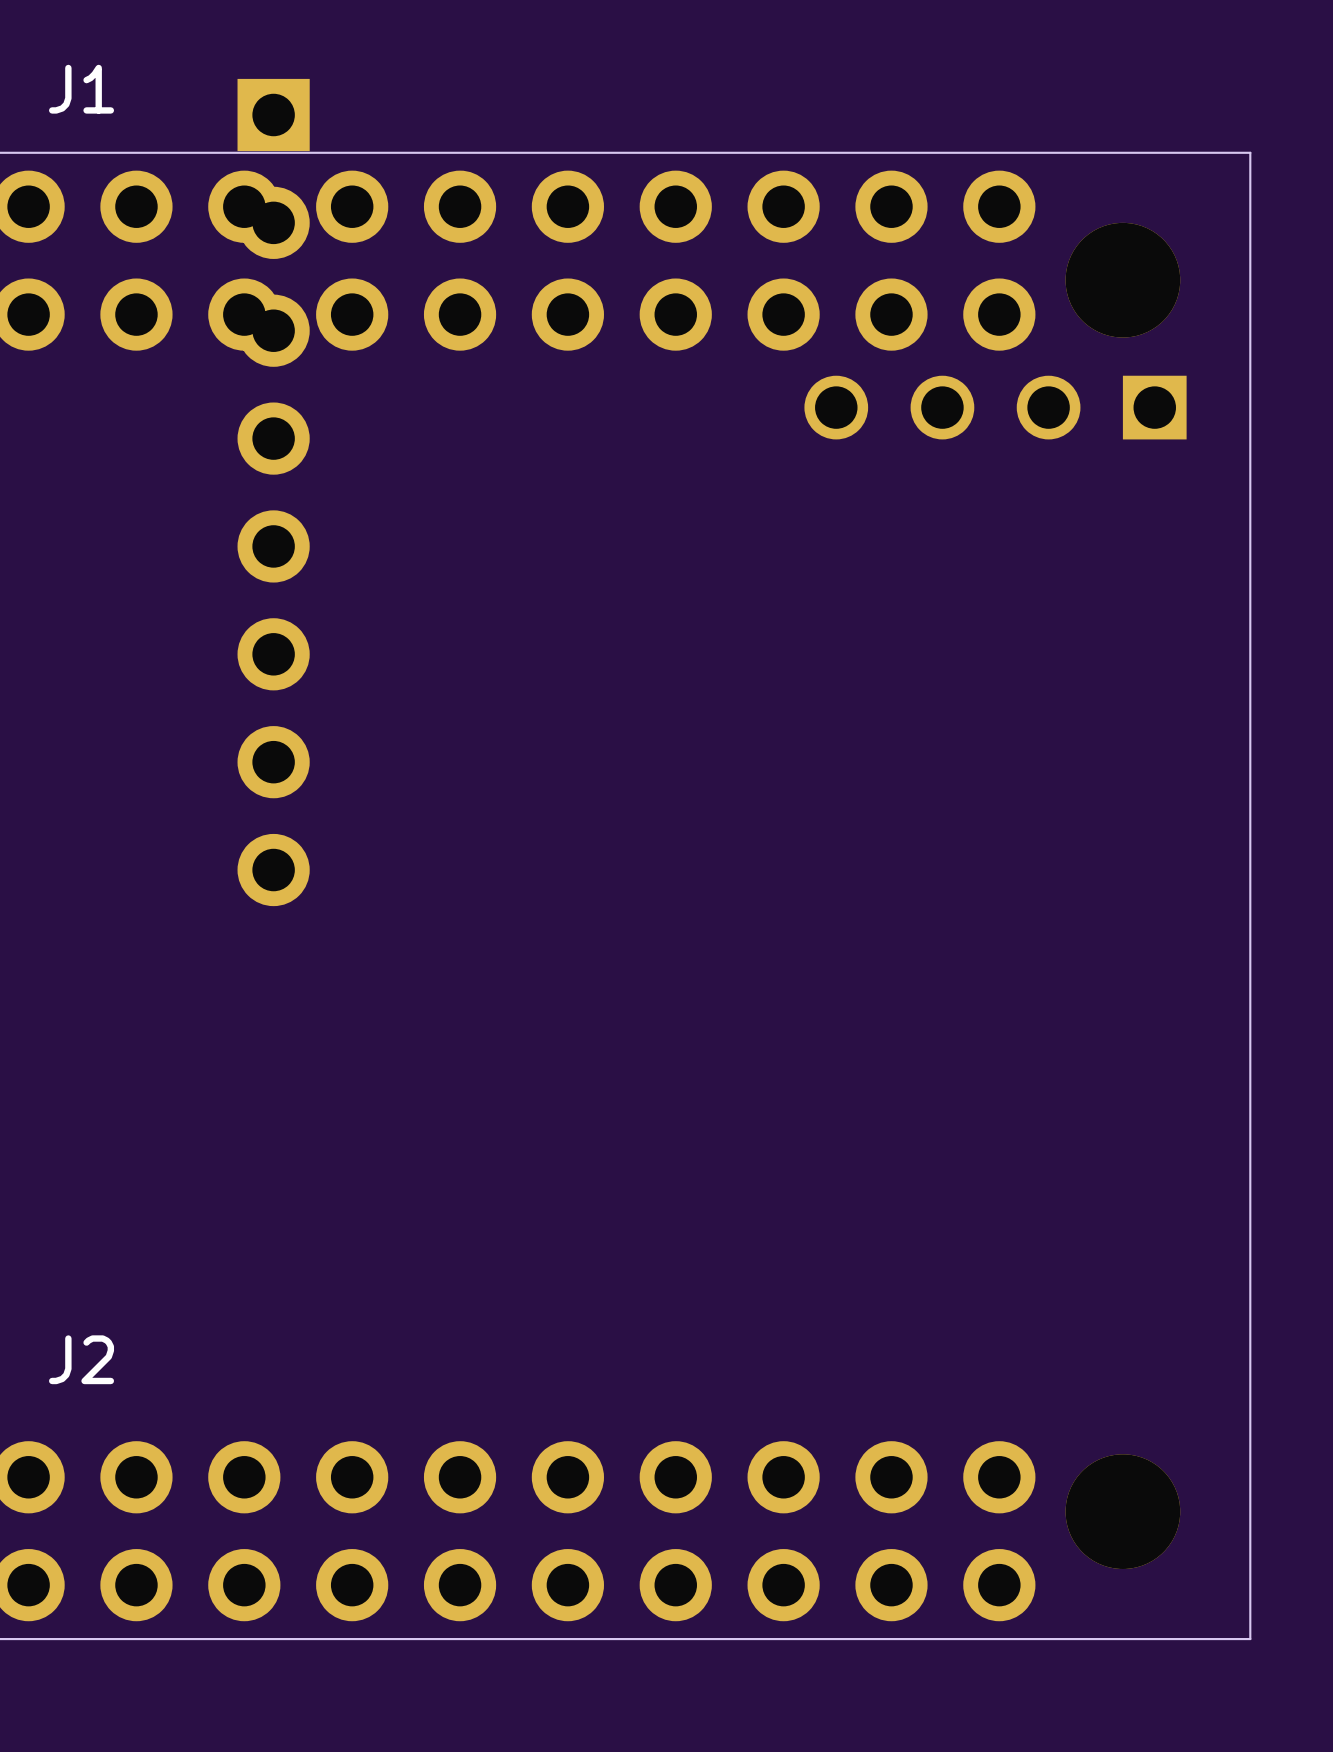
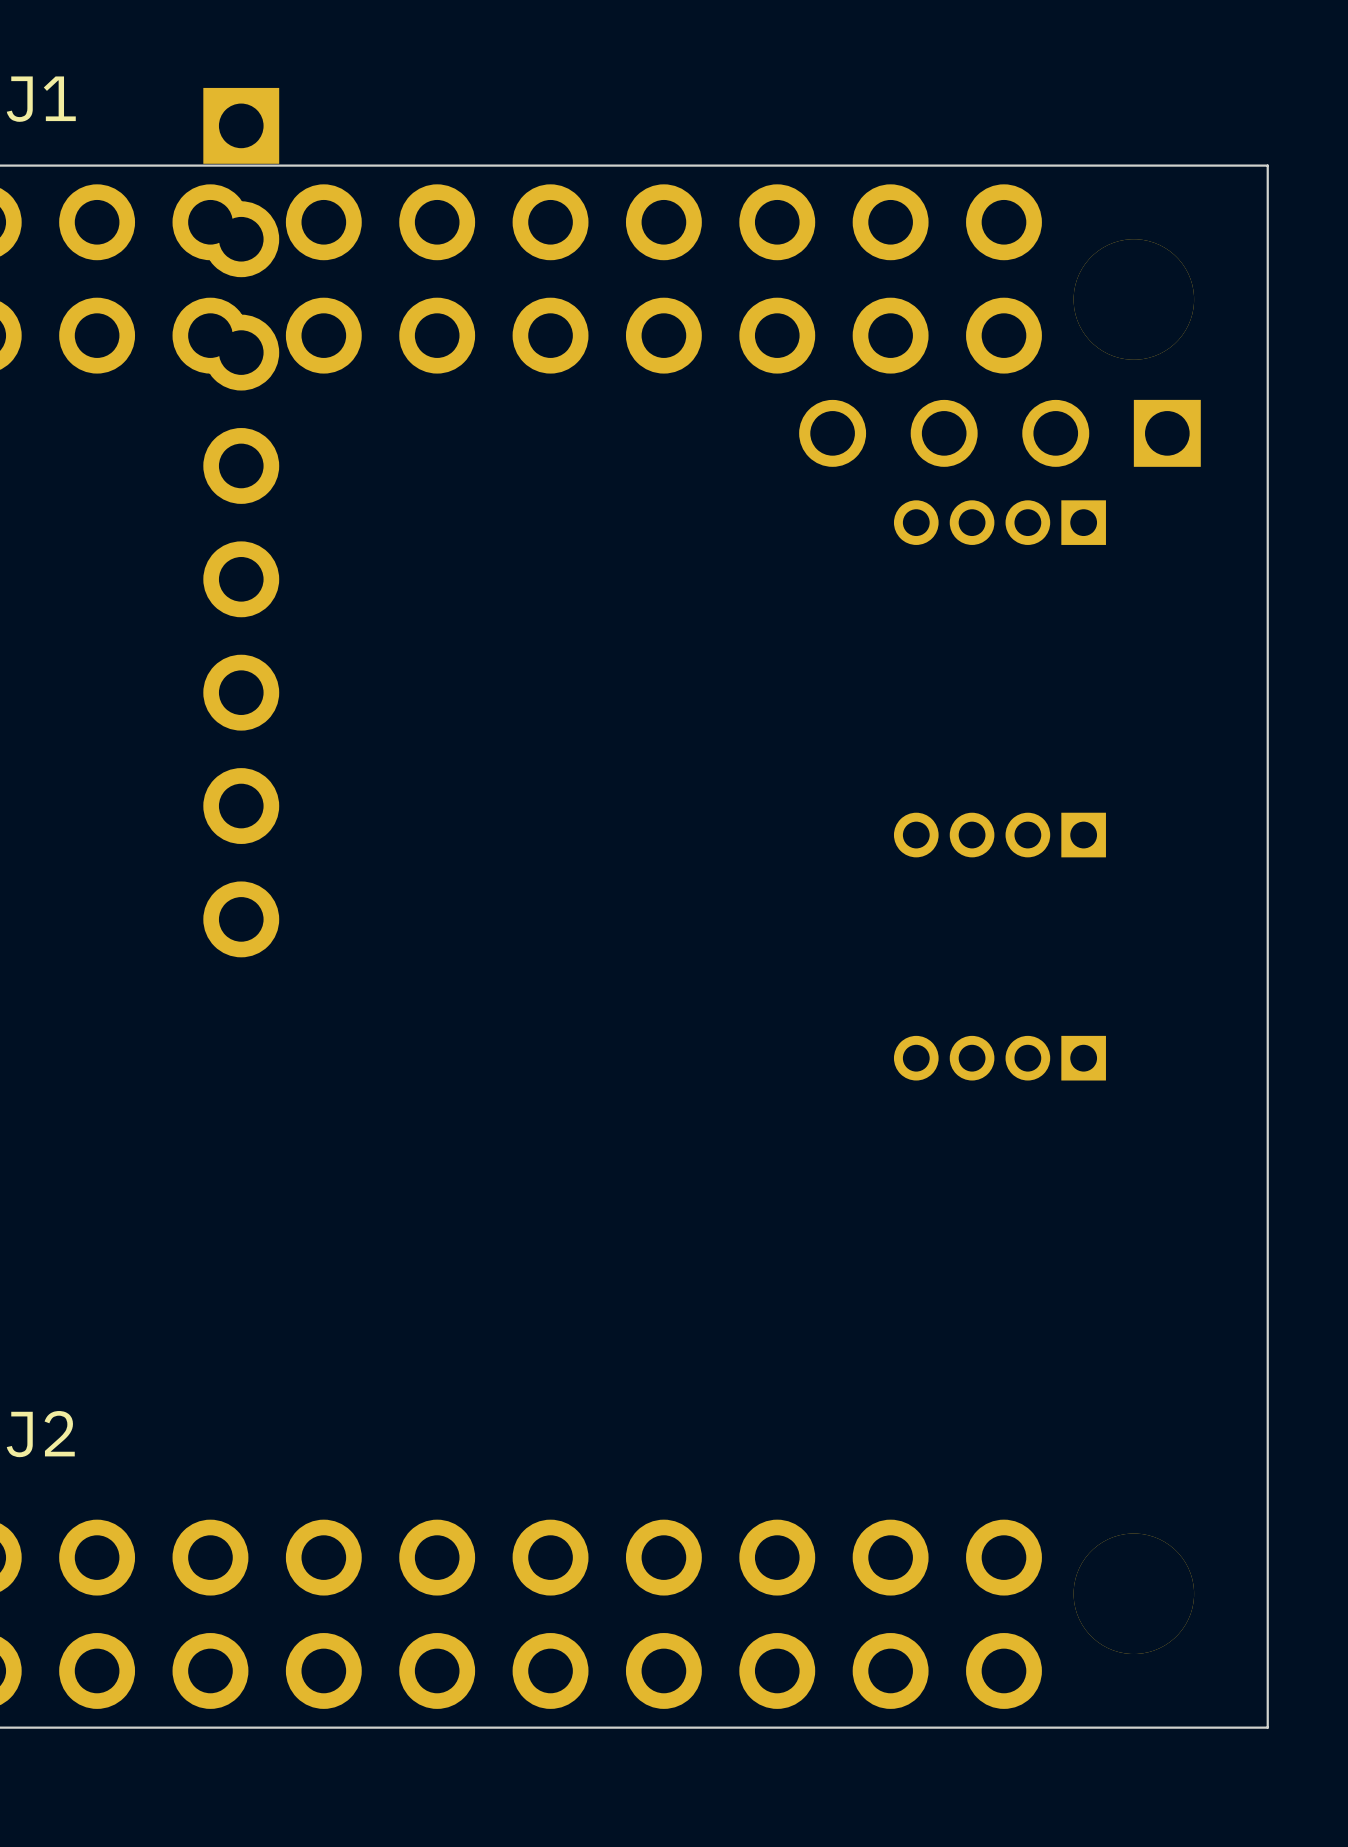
part: none -> (999, 522)
part: none -> (999, 835)
part: none -> (999, 1058)

